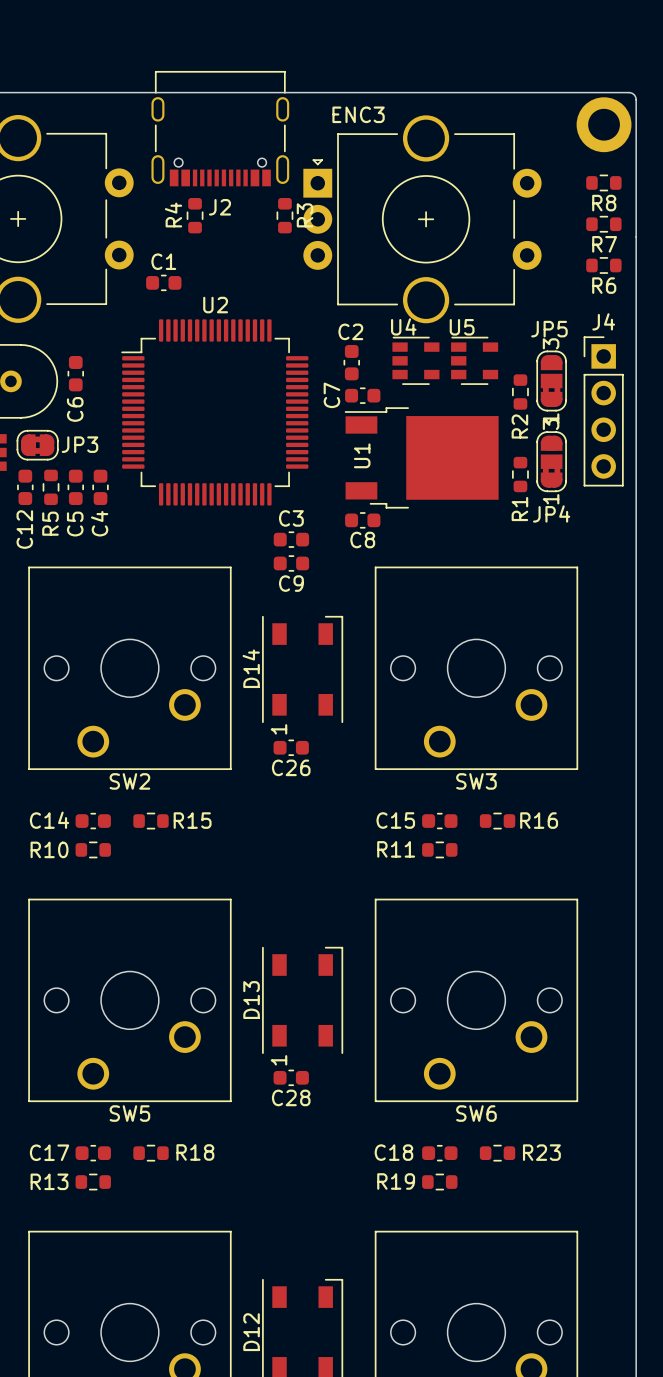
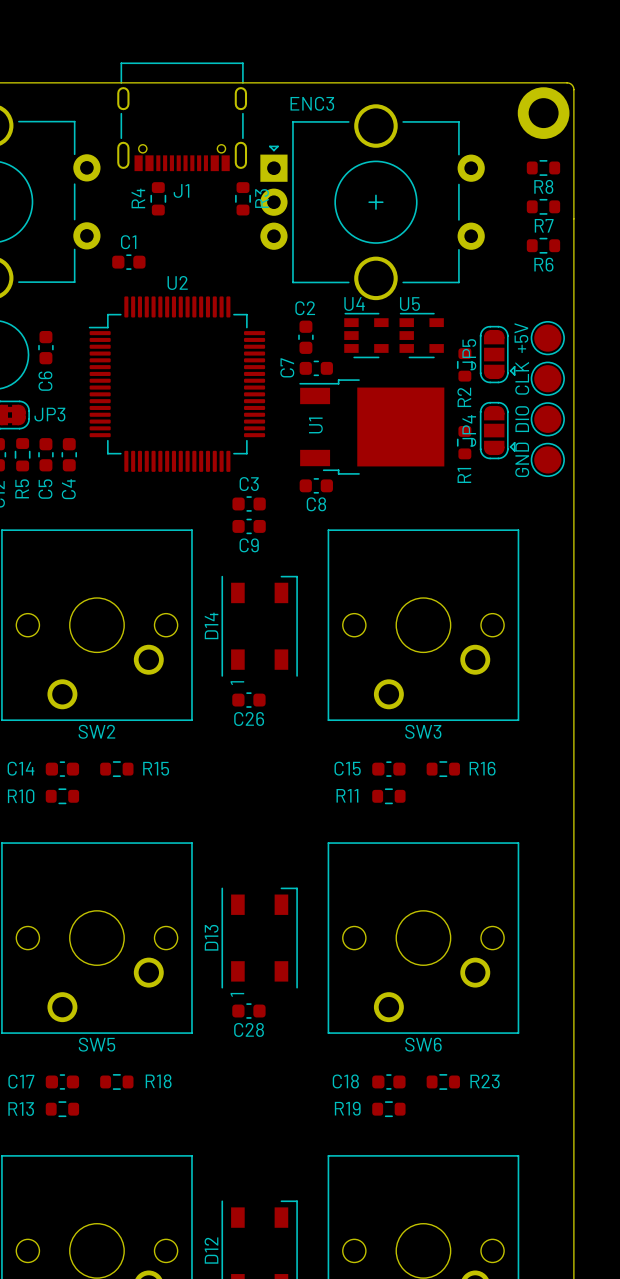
J2 name: J2 (219, 207) -> J1 (181, 190)
JP5 name position: JP5 (549, 329) -> JP5 (469, 354)
JP5 footprint: [536, 350, 567, 412] -> [479, 325, 516, 384]
+5V: none -> (547, 338)
CLK: none -> (547, 378)
J4: (603, 411) -> none
JP4 footprint: [536, 431, 567, 493] -> [479, 401, 516, 460]
DIO: none -> (547, 419)
GND: none -> (547, 459)
JP4 name position: JP4 (551, 513) -> JP4 (469, 430)

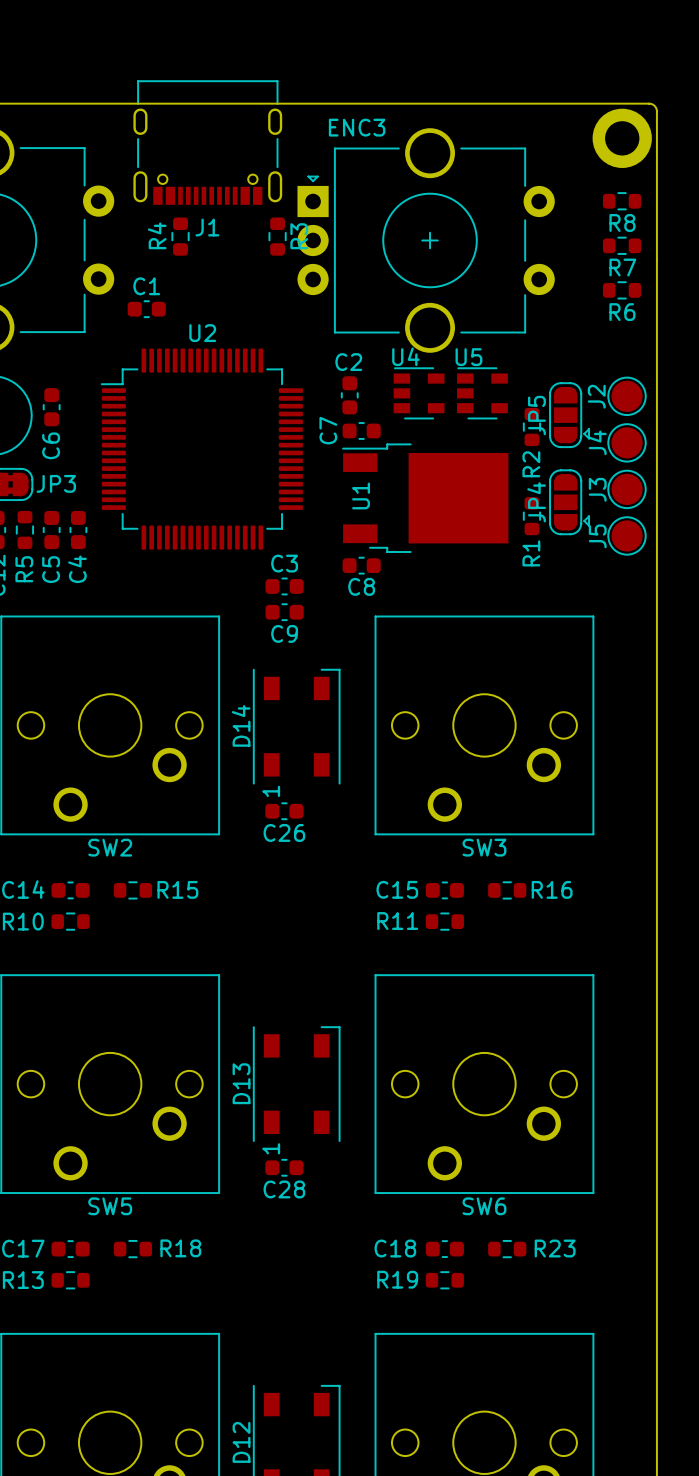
+5V name: +5V (521, 338) -> J2 (596, 396)
CLK name: CLK (522, 378) -> J4 (597, 442)
DIO name: DIO (522, 419) -> J3 (597, 489)
GND name: GND (522, 459) -> J5 (597, 536)

